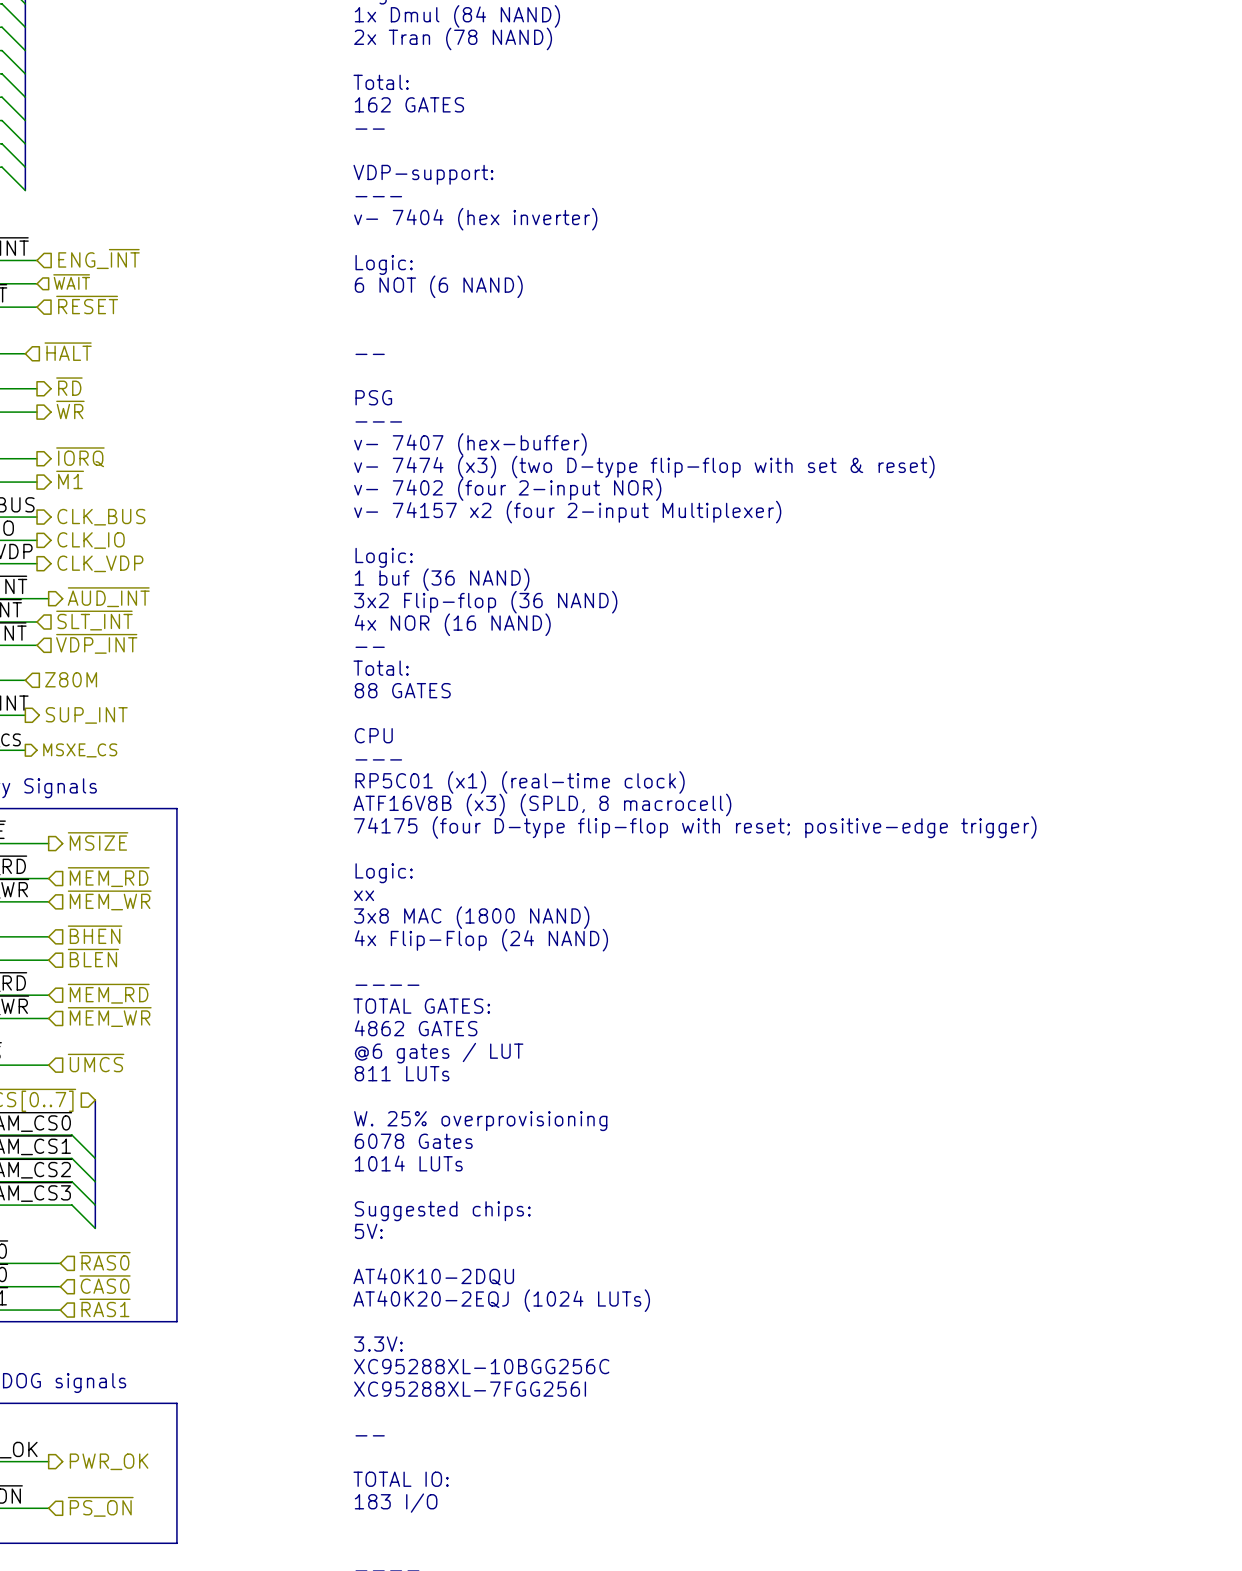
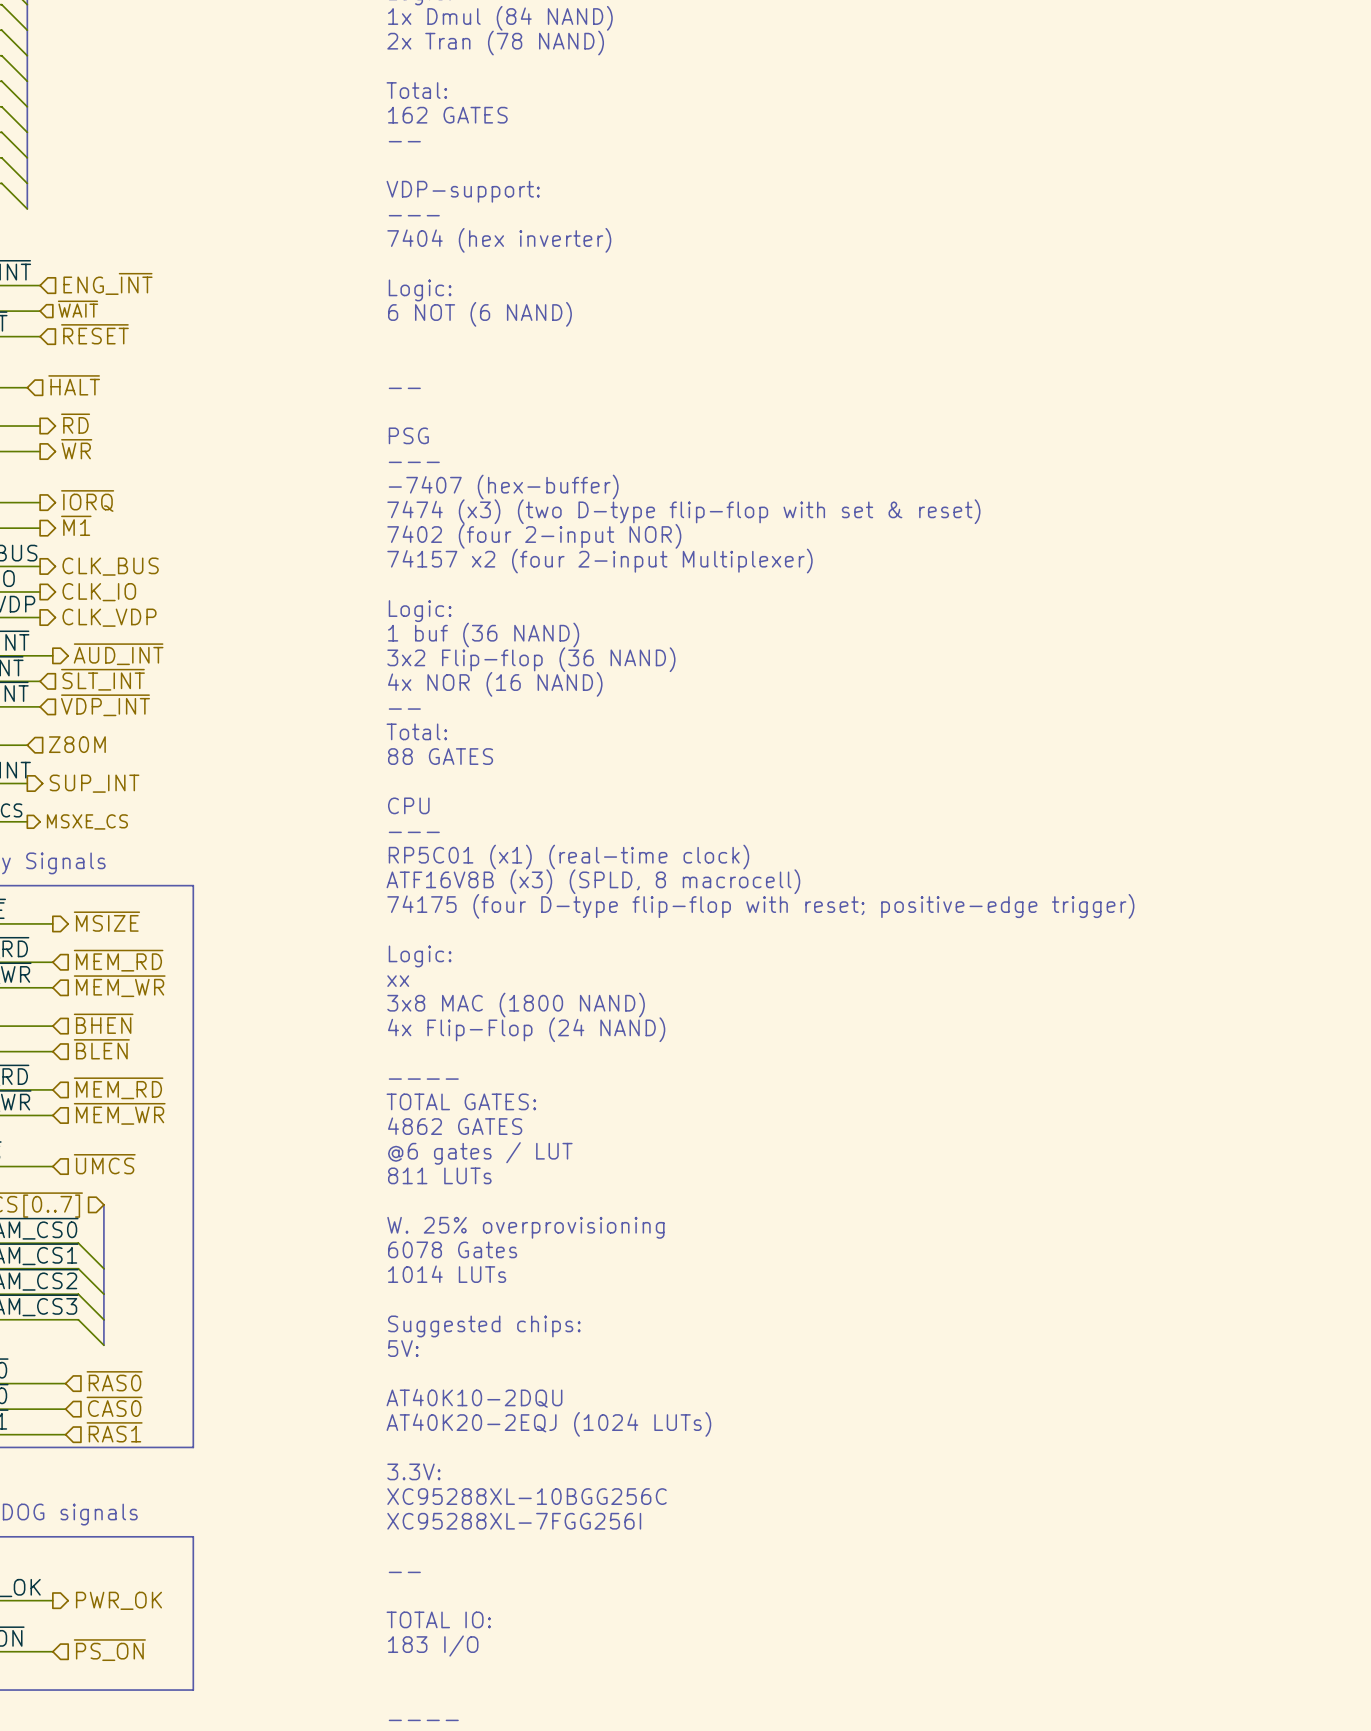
text: v- 7404 (hex inverter) (475, 219) -> 7404 (hex inverter) (499, 240)
text: v- 7407 (hex-buffer) (470, 444) -> -7407 (hex-buffer) (503, 487)
text: v- 7474 (x3) (two D-type flip-flop with set & reset) (644, 467) -> 7474 (x3) (two D-type flip-flop with set & reset) (683, 511)
text: v- 7402 (four 2-input NOR) (507, 489) -> 7402 (four 2-input NOR) (534, 536)
text: v- 74157 x2 (four 2-input Multiplexer) (567, 512) -> 74157 x2 (four 2-input Multiplexer) (599, 561)

